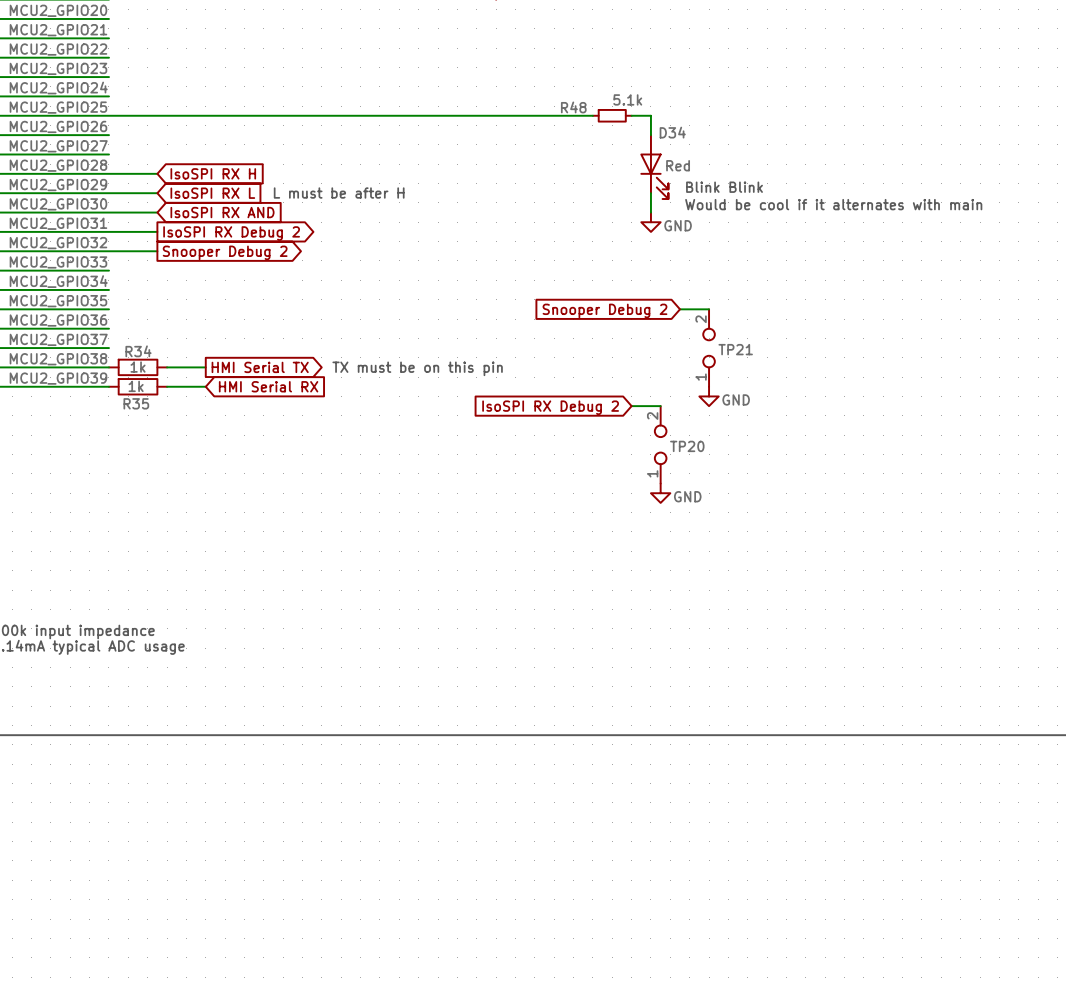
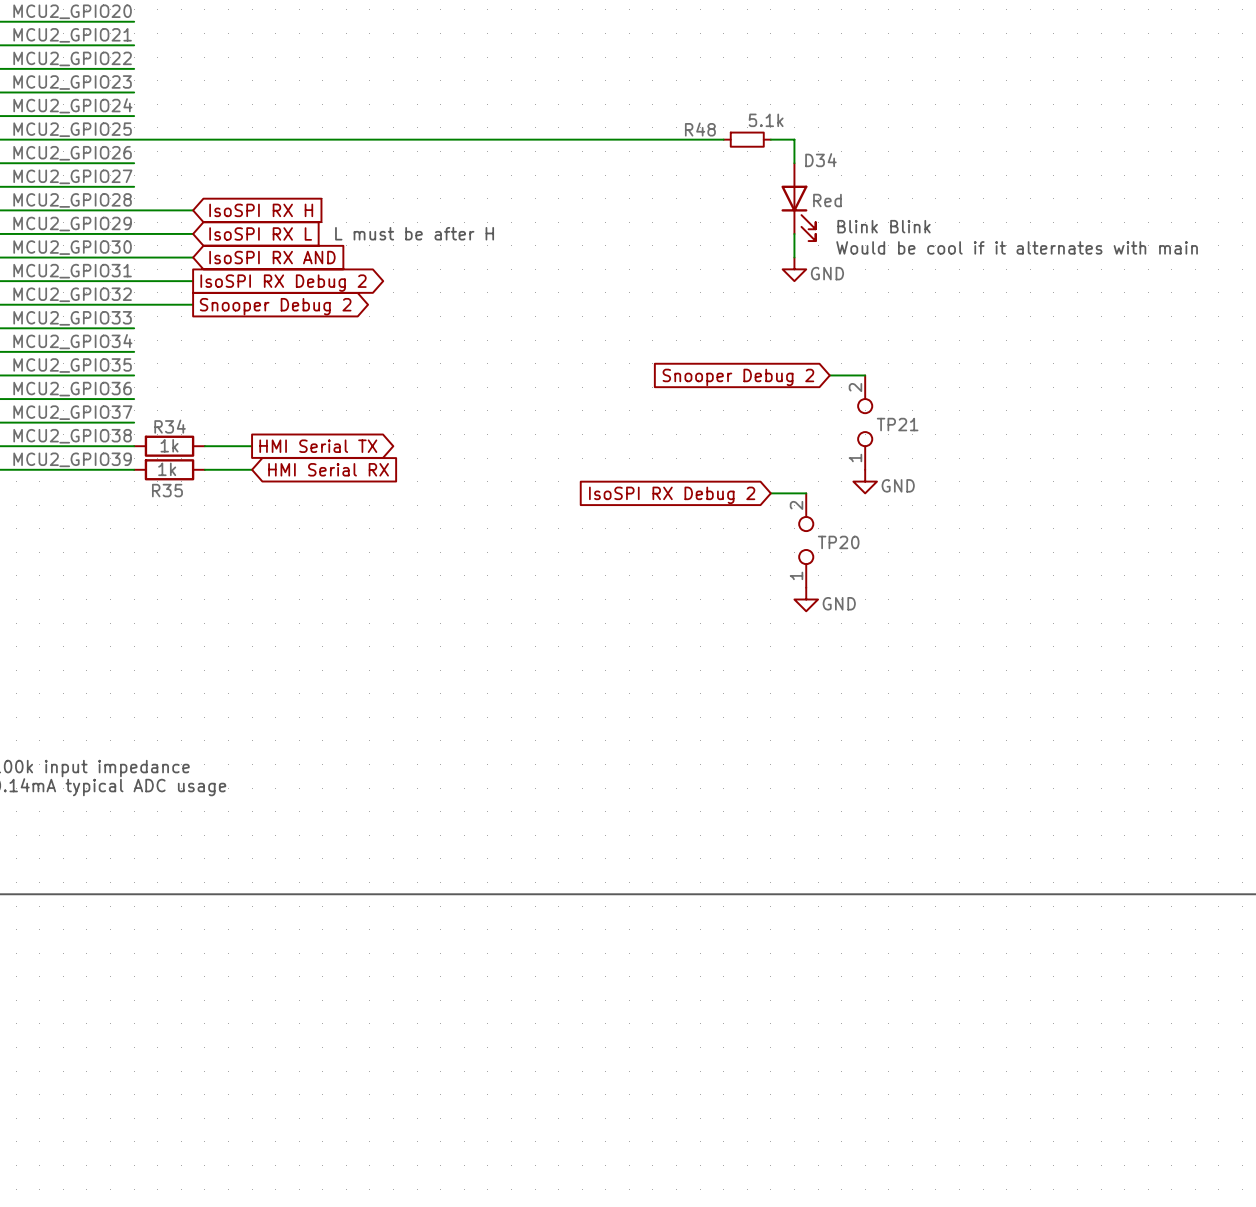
text: TX must be on this pin (417, 368) -> none

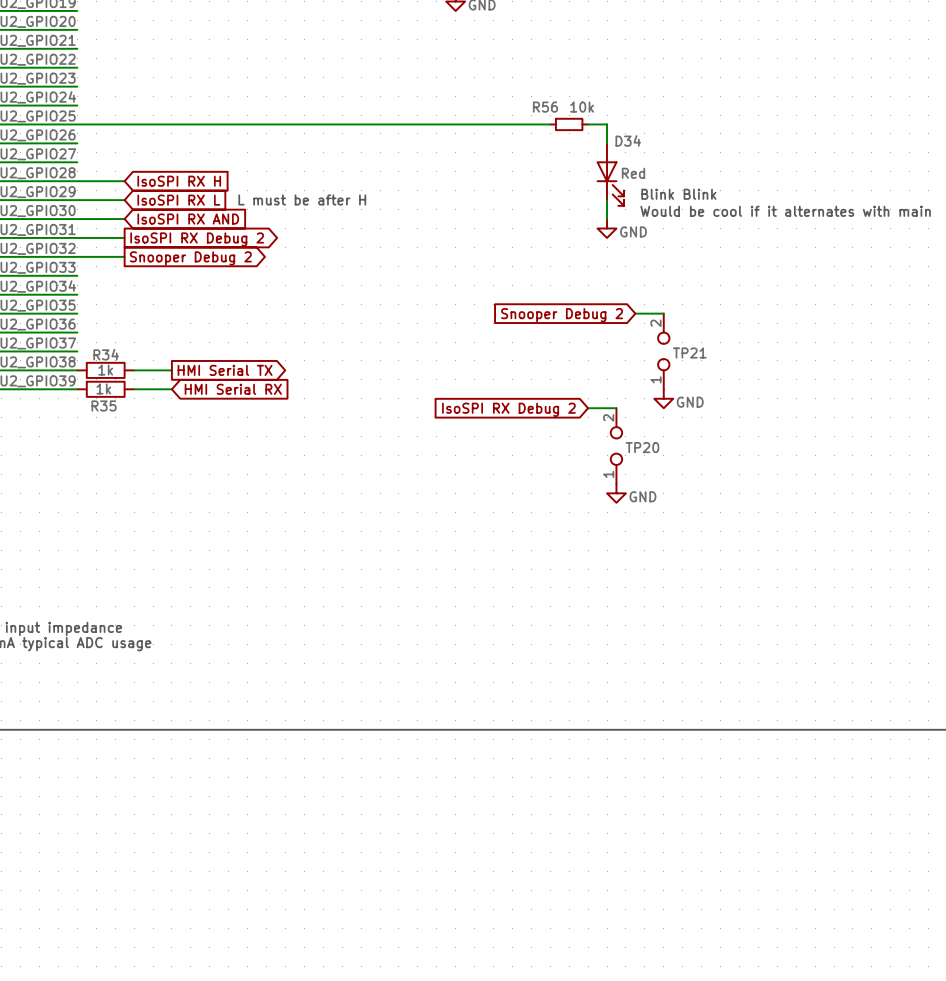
R48 value: 5.1k (766, 120) -> 10k (582, 107)
R48 name: R48 (700, 129) -> R56 (545, 107)

